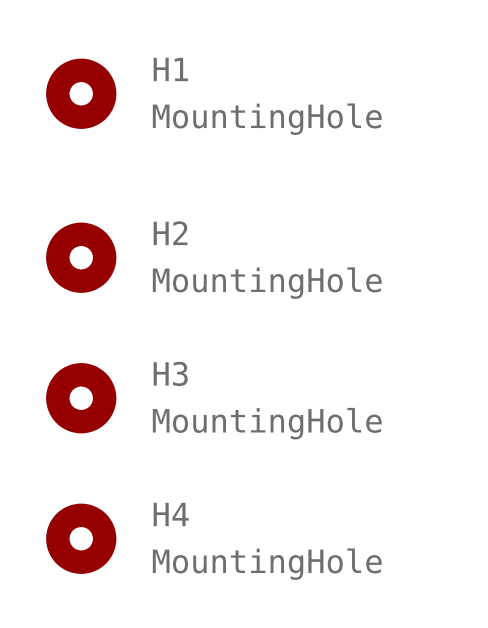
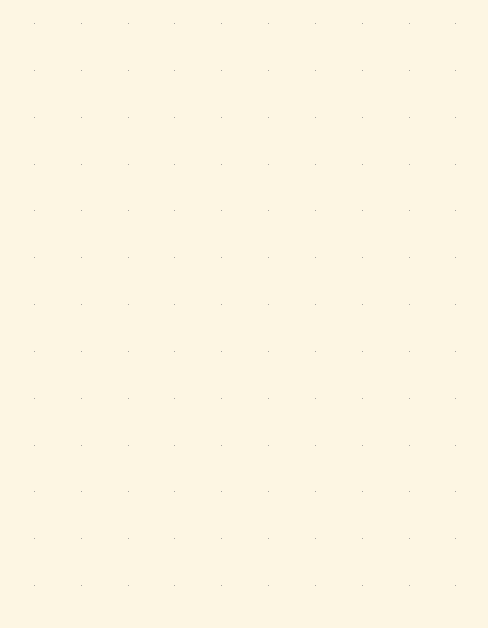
H1: MountingHole (81, 93) -> none
H2: MountingHole (81, 257) -> none
H3: MountingHole (81, 398) -> none
H4: MountingHole (81, 538) -> none

